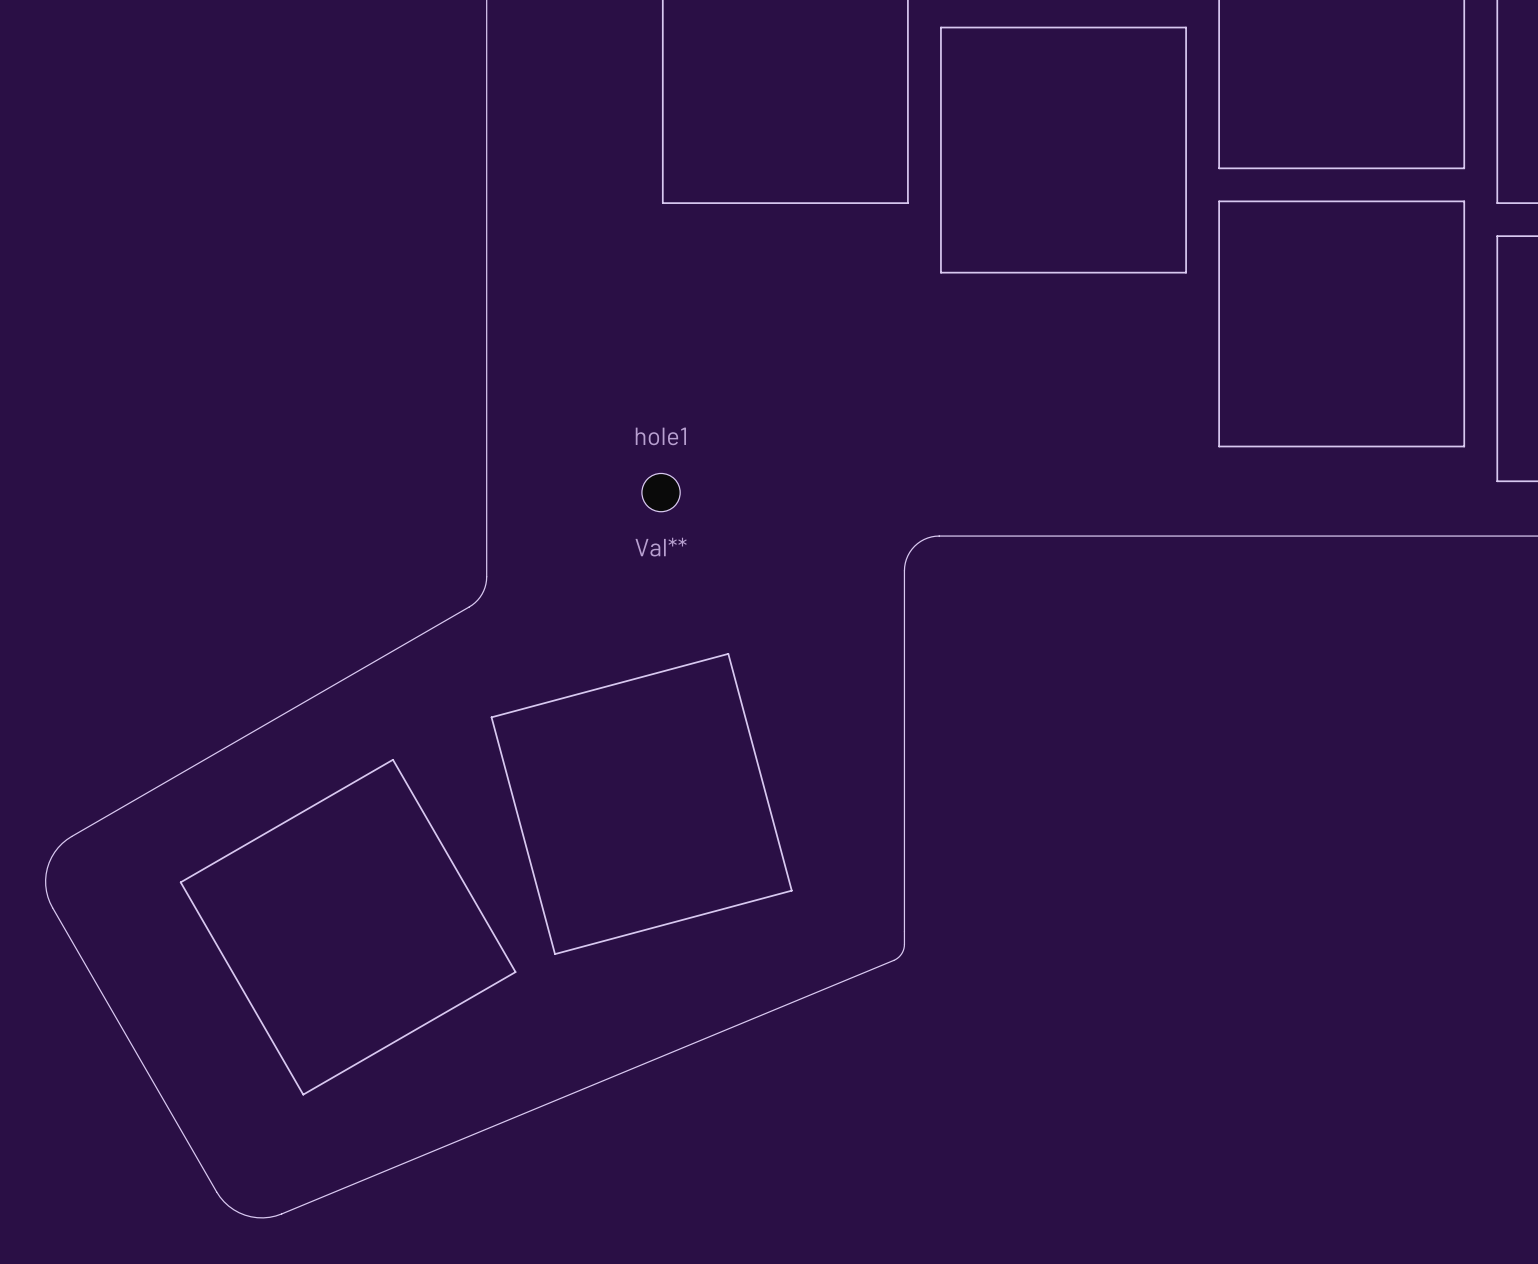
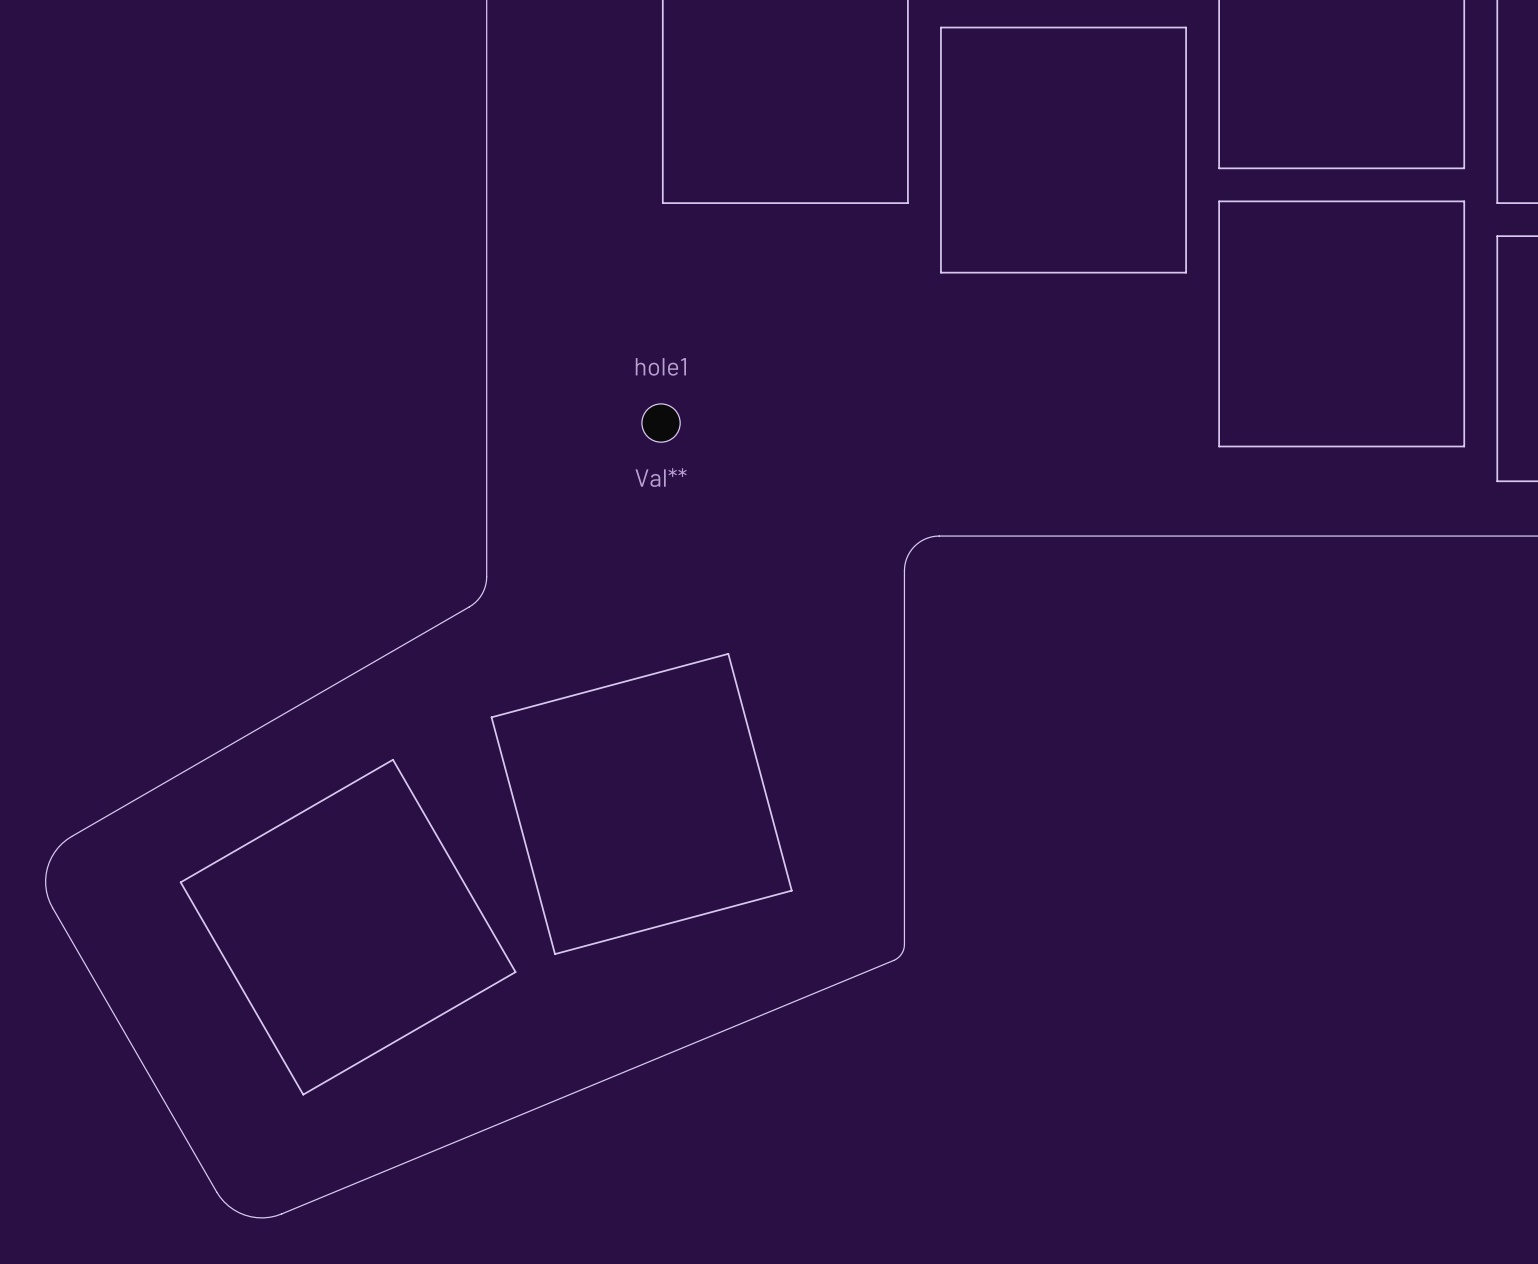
hole1 position: (661, 492) -> (661, 423)

